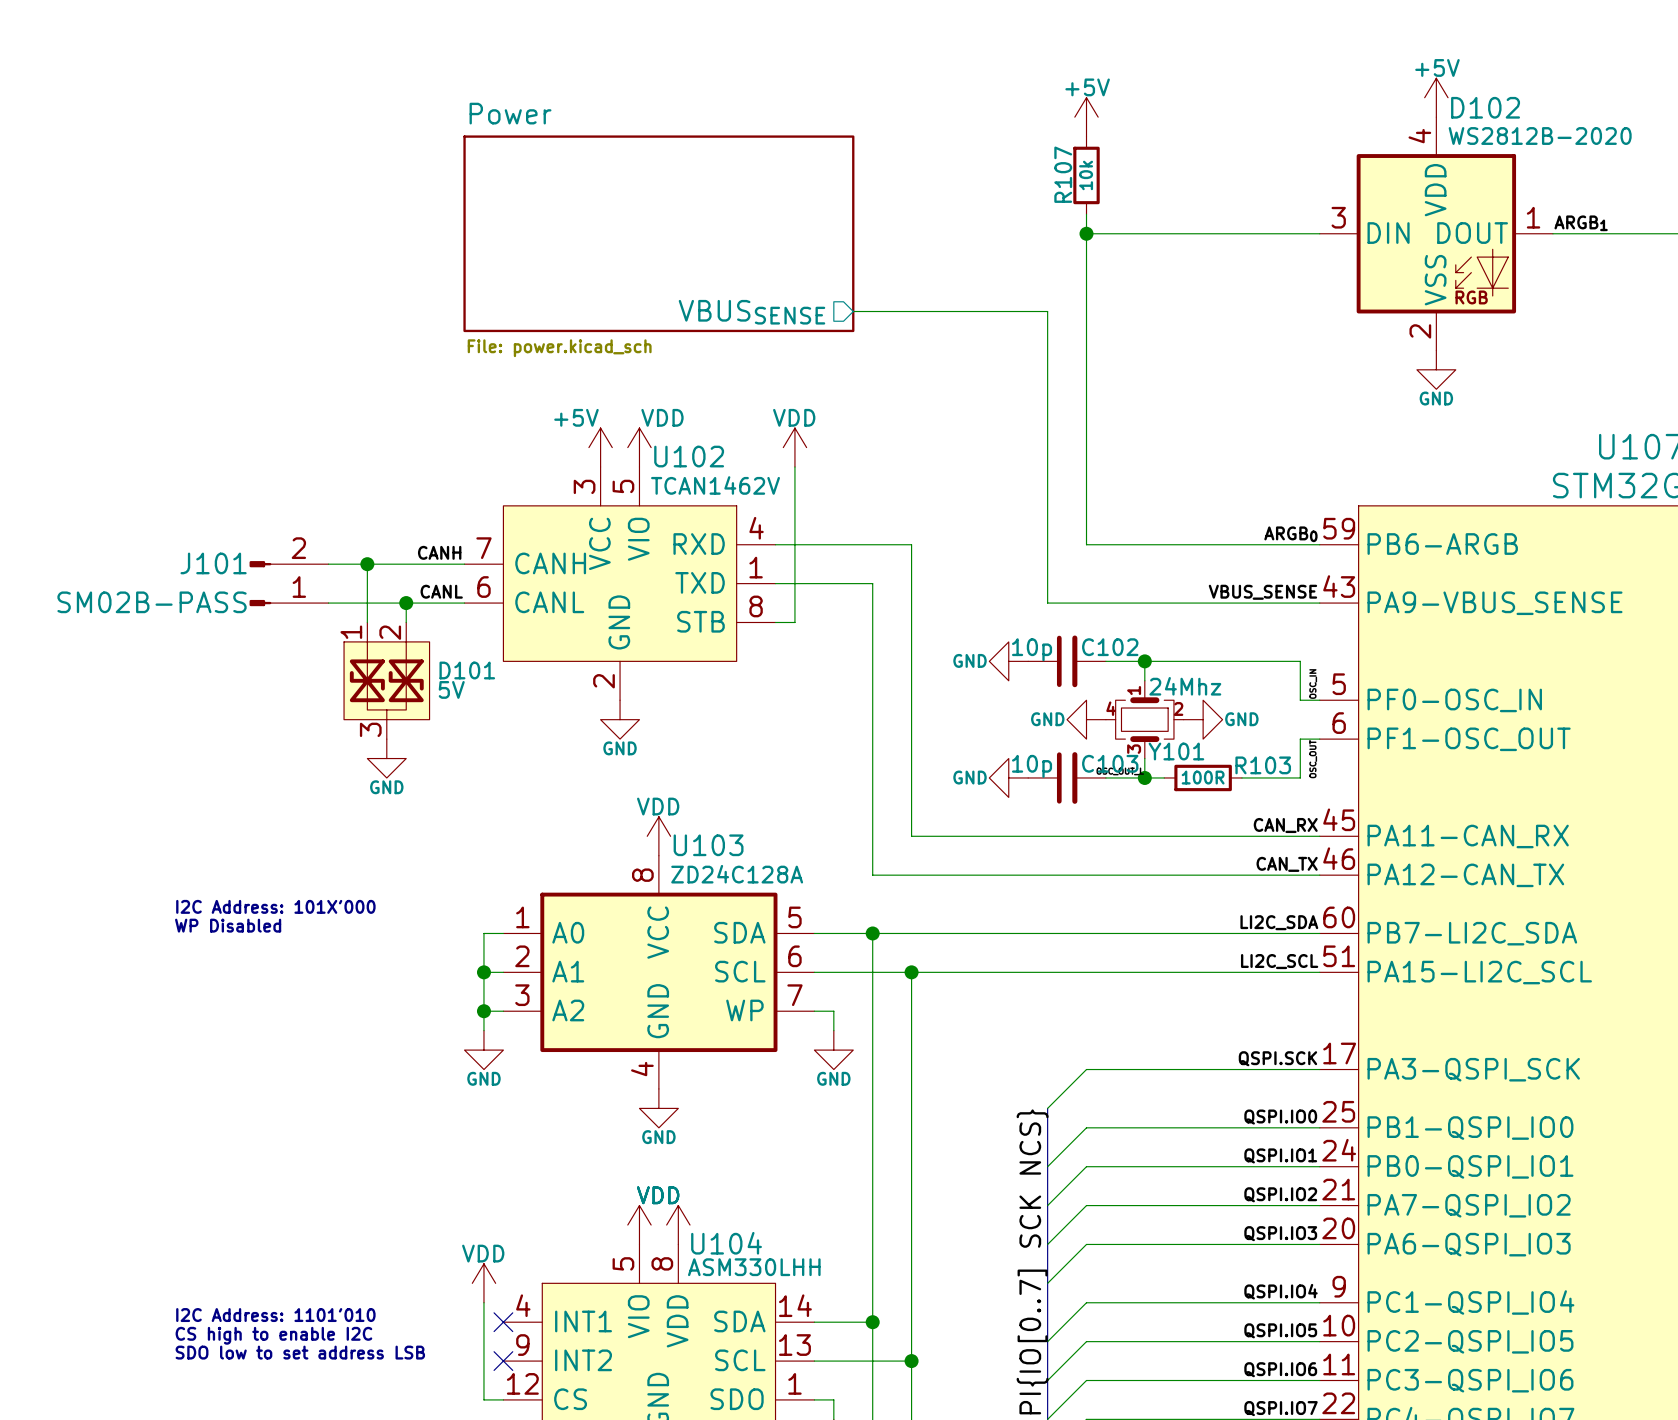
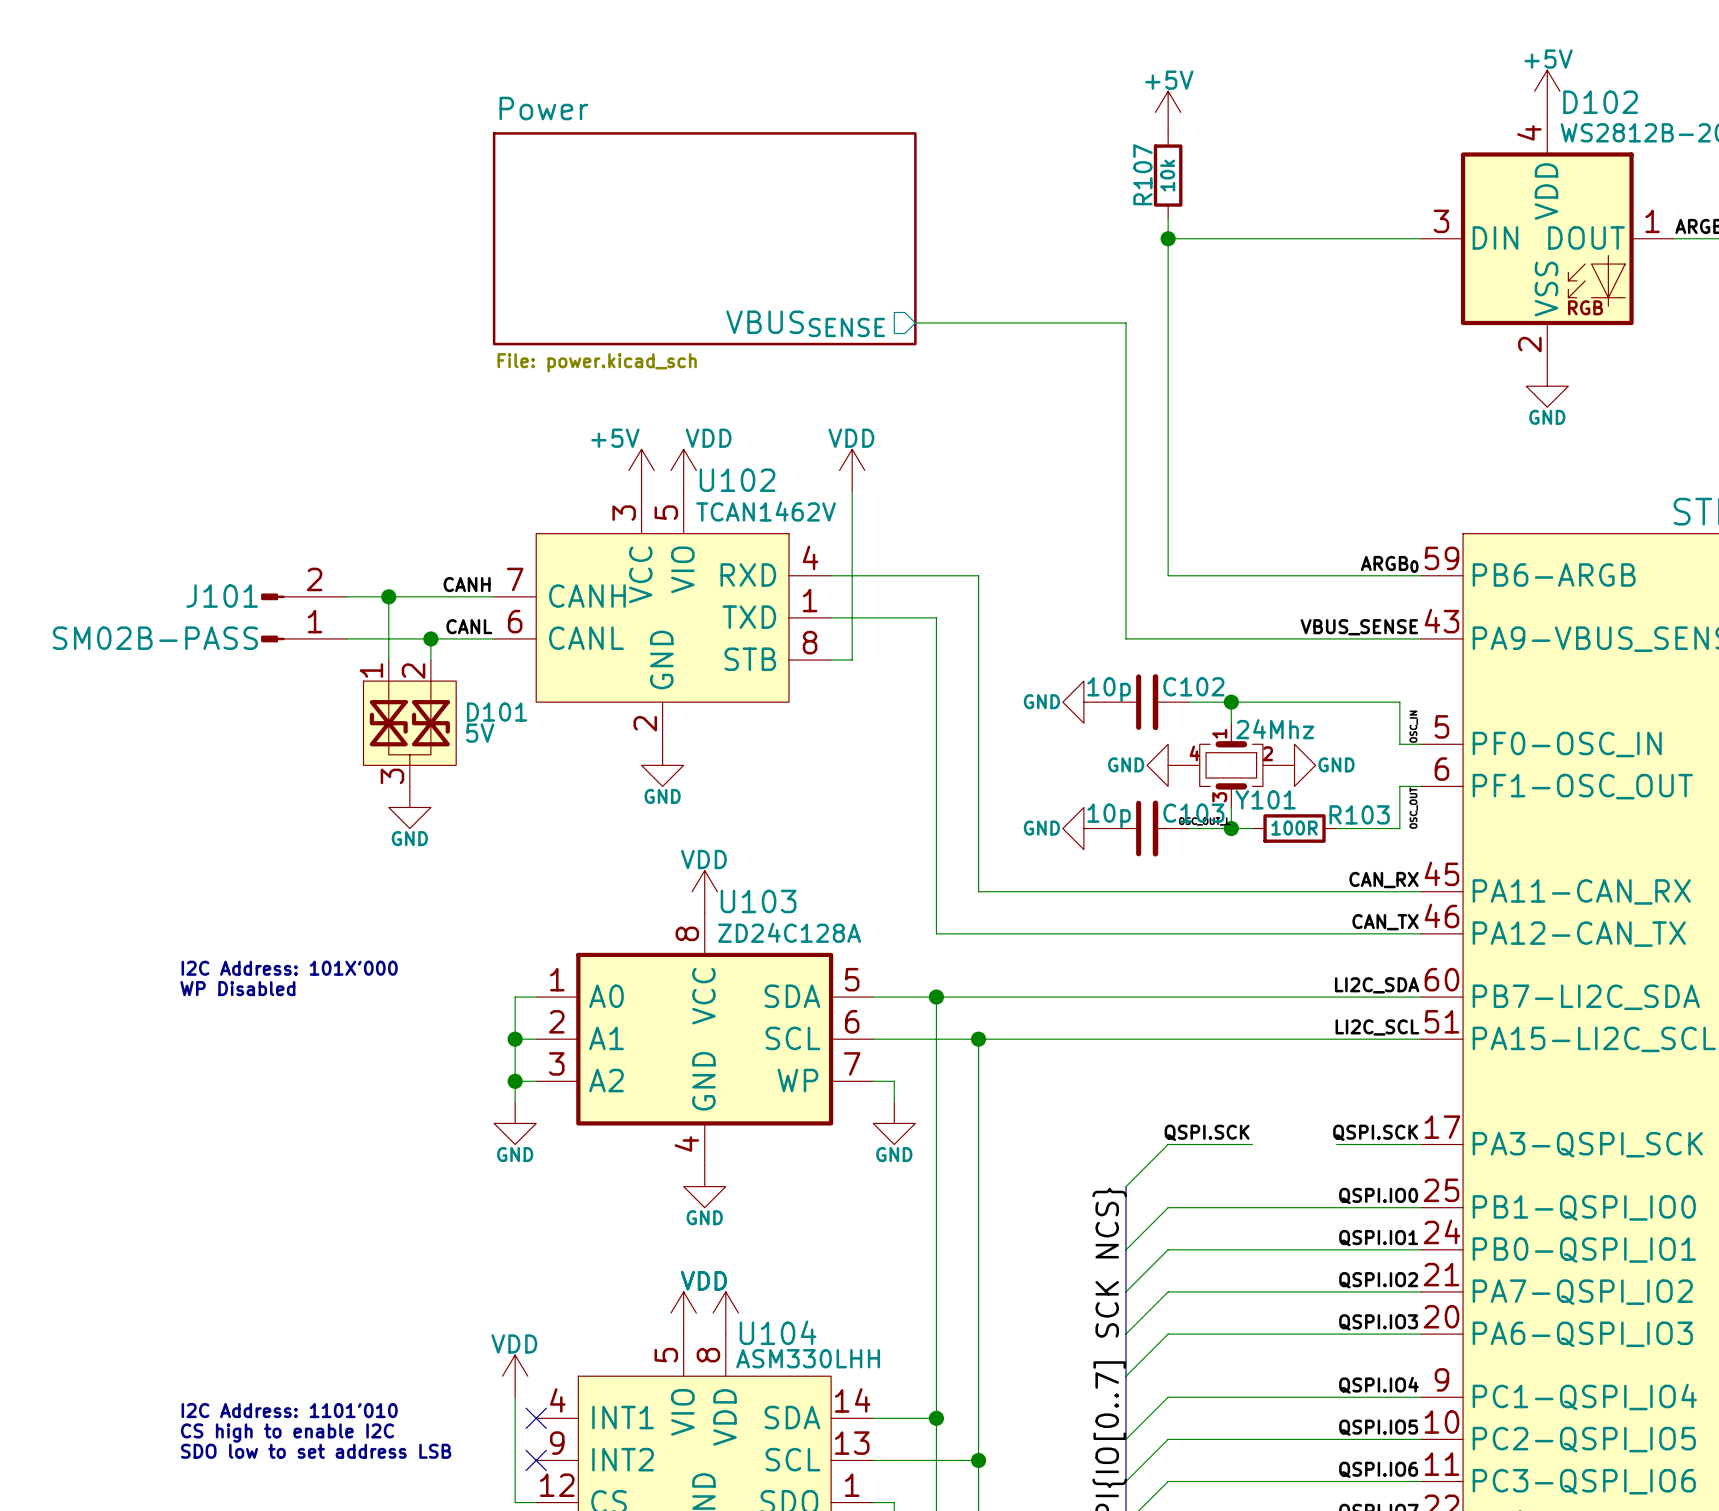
label: none -> QSPI.SCK (1207, 1132)
wire: (1164, 1069) (1241, 1069) -> none

